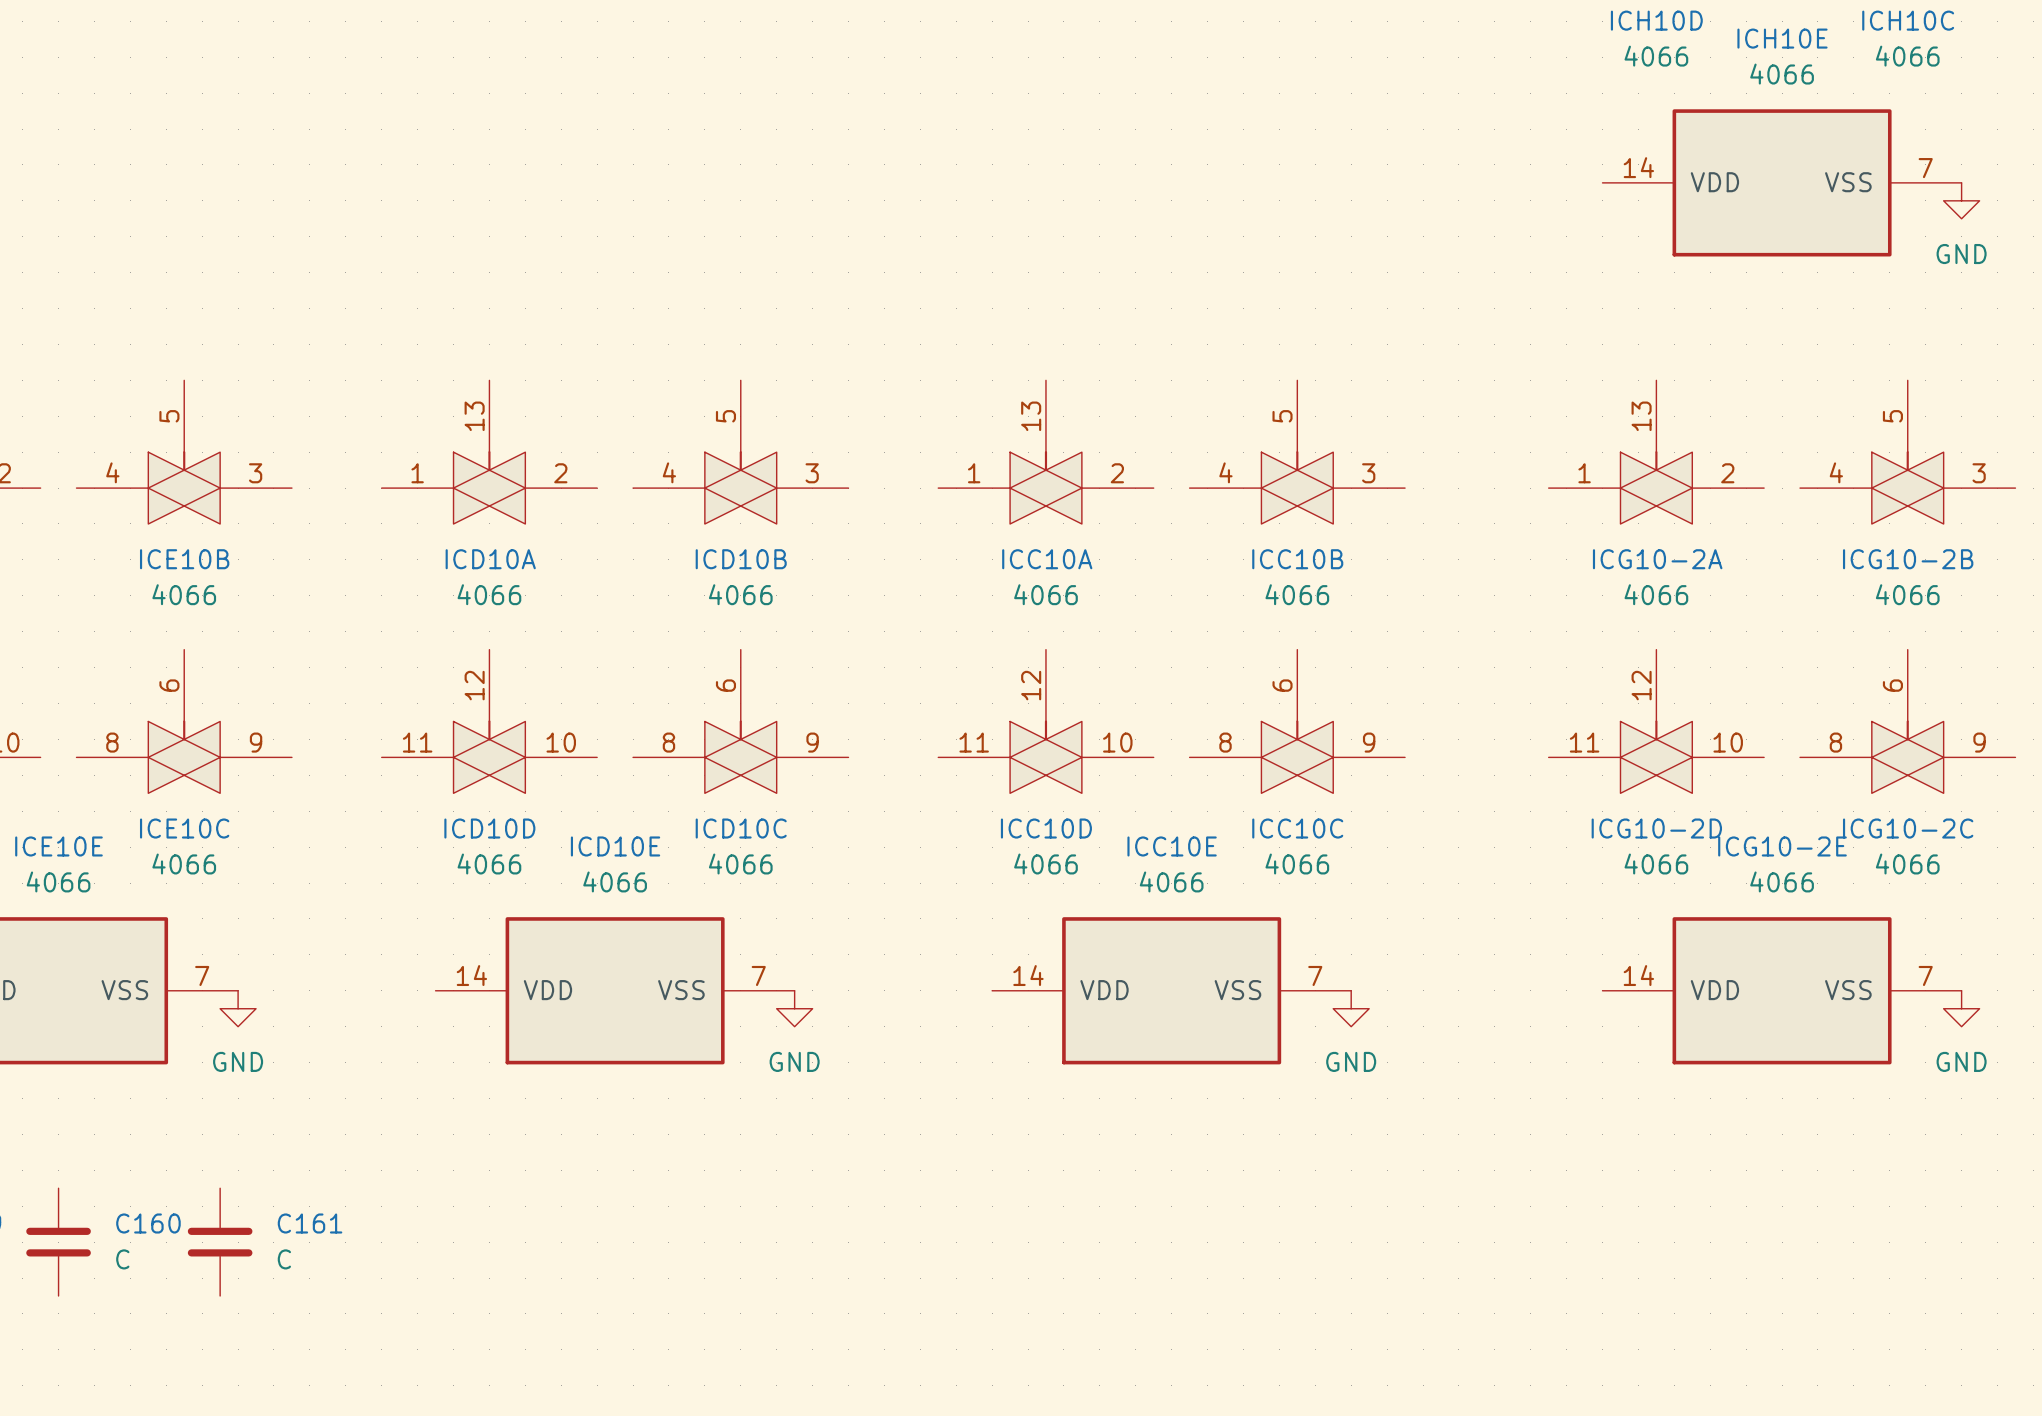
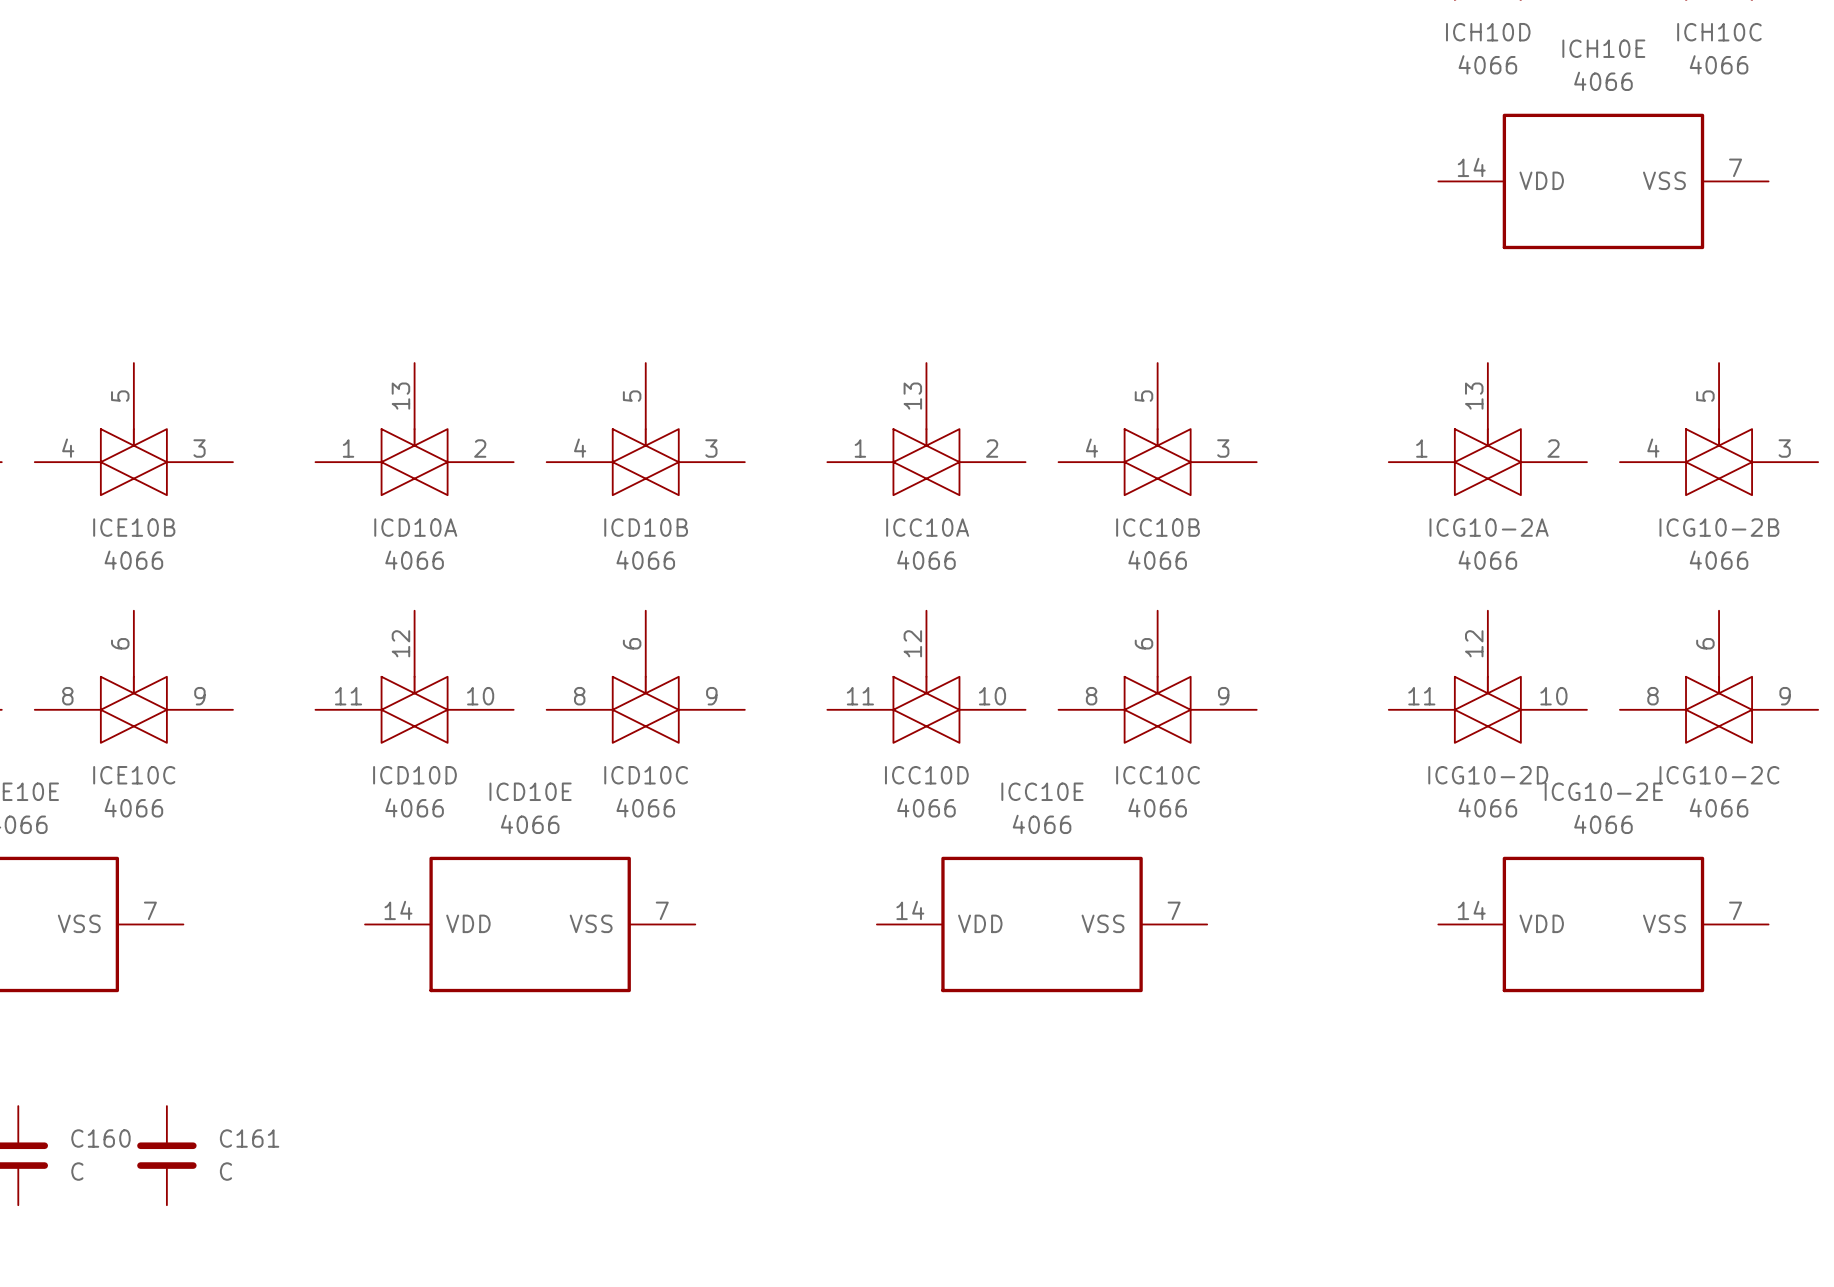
power symbol: GND (1961, 200) -> none
power symbol: GND (238, 1008) -> none
power symbol: GND (794, 1008) -> none
power symbol: GND (1351, 1008) -> none
power symbol: GND (1961, 1008) -> none

